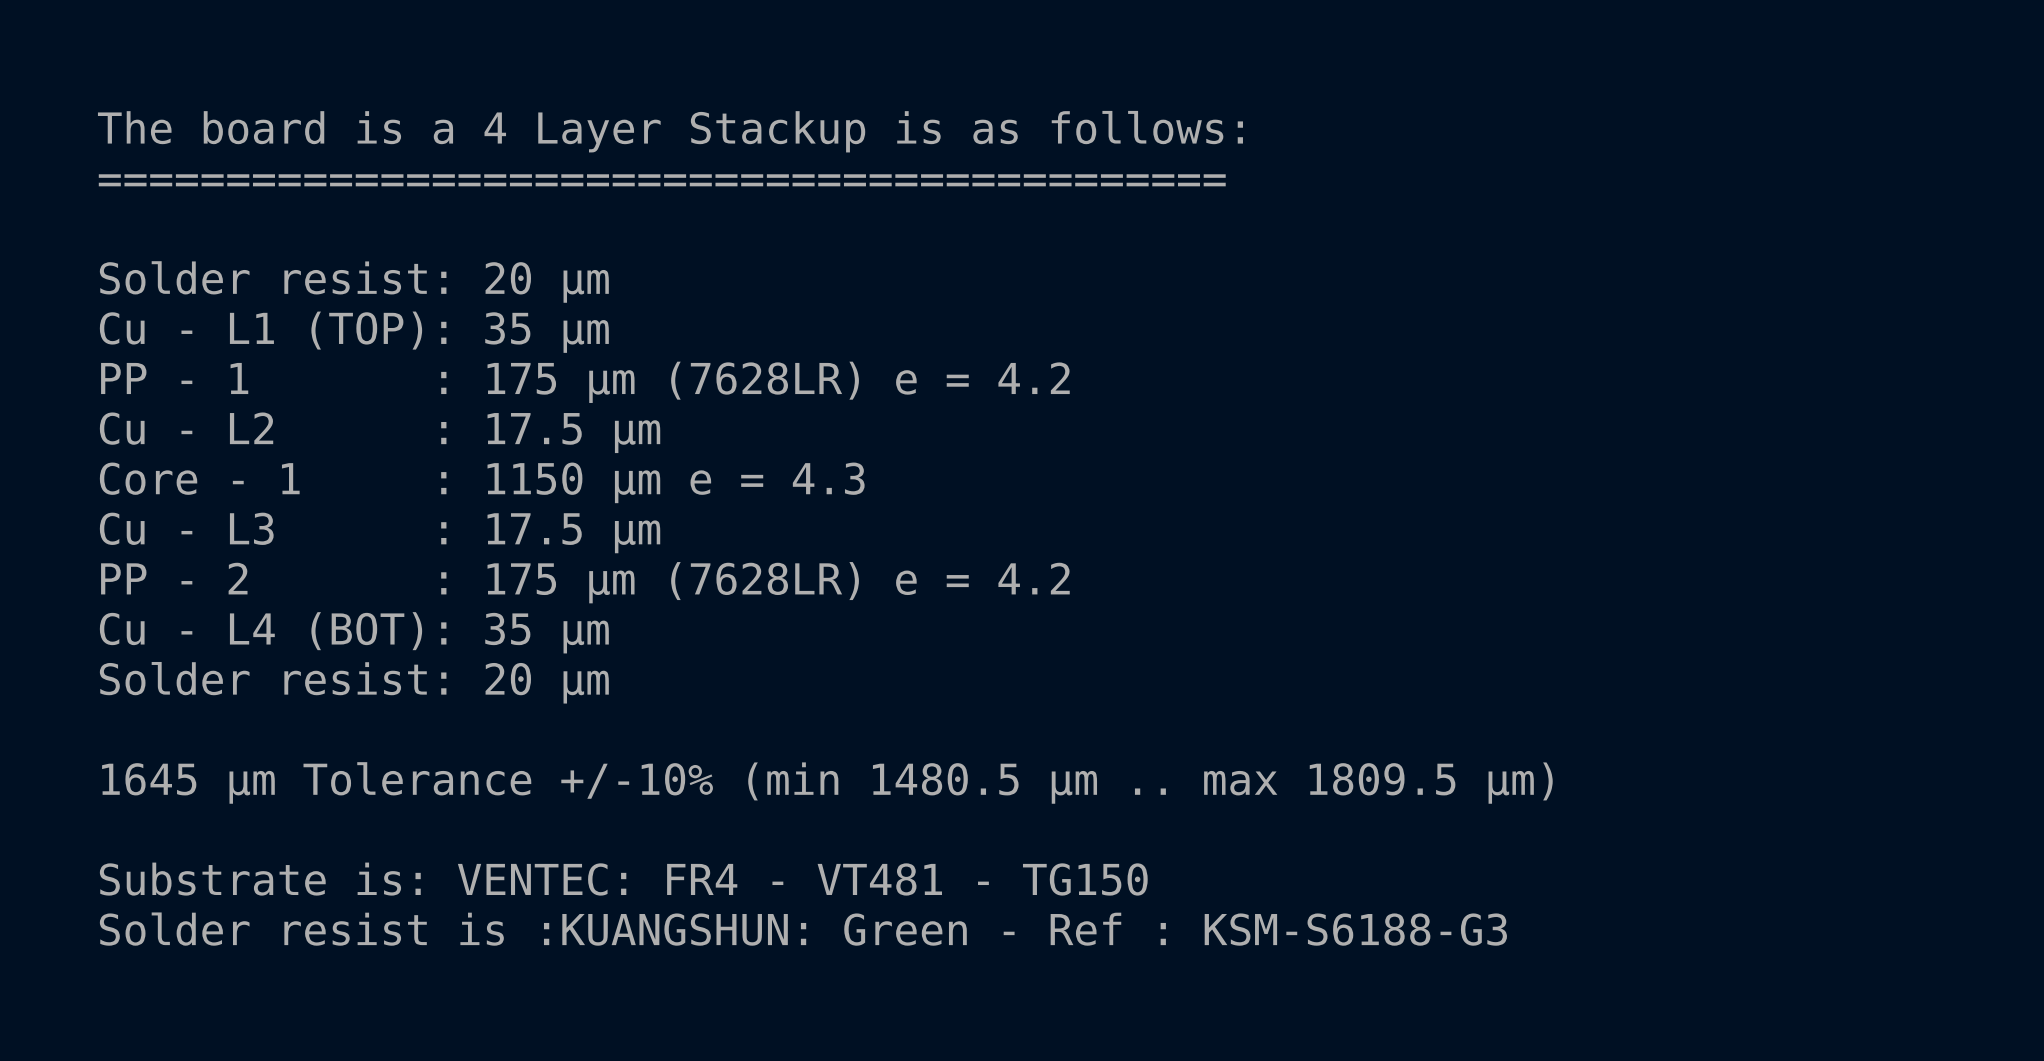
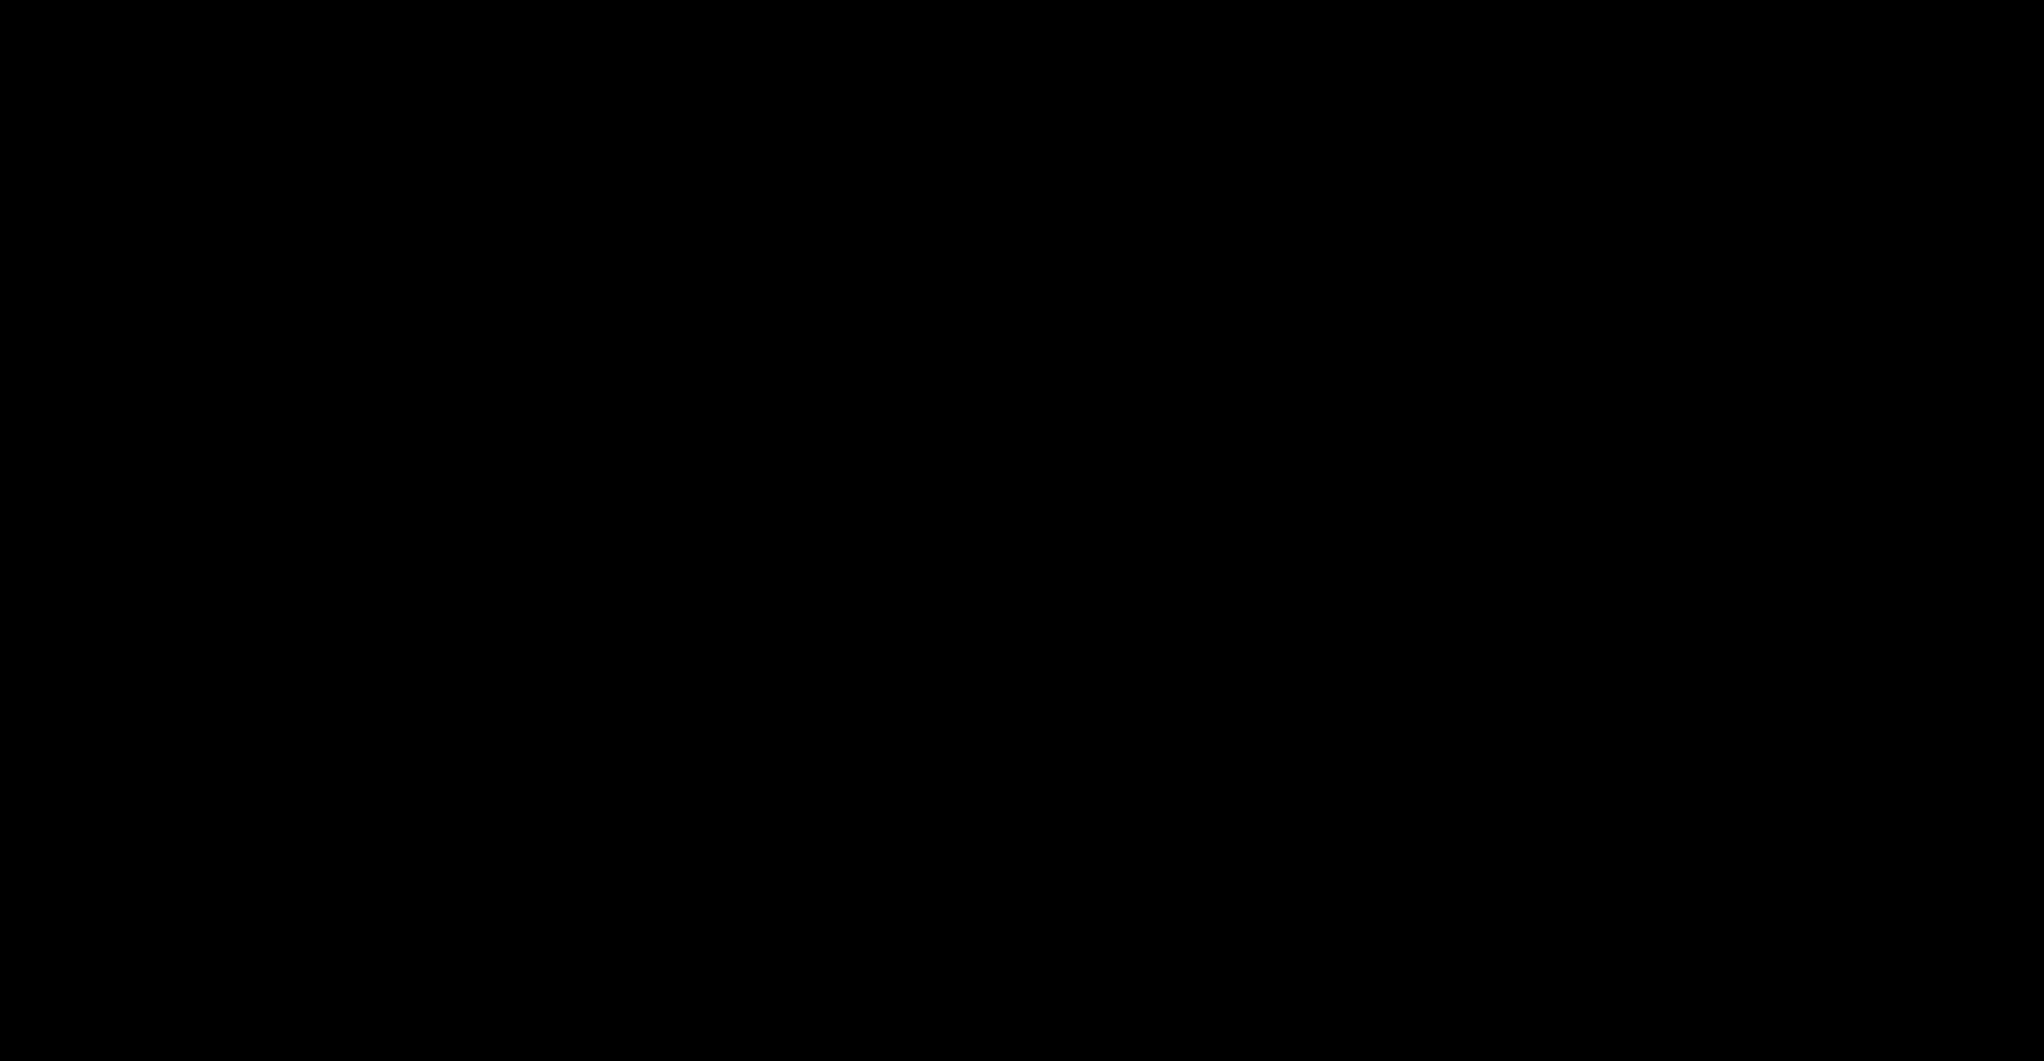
text: The board is a 4 Layer Stackup is as follows: (670, 131) -> none
text: ============================================ (662, 180) -> none
text: Solder resist: 20 µm (354, 281) -> none
text: Cu - L1 (TOP): 35 µm (354, 332) -> none
text: PP - 1 : 175 µm (7628LR) e = 4.2 (585, 382) -> none
text: Cu - L2 : 17.5 µm (380, 432) -> none
text: Core - 1 : 1150 µm e = 4.3 (482, 482) -> none
text: Cu - L3 : 17.5 µm (380, 532) -> none
text: PP - 2 : 175 µm (7628LR) e = 4.2 (585, 582) -> none
text: Cu - L4 (BOT): 35 µm (354, 632) -> none
text: Solder resist: 20 µm (354, 682) -> none
text: 1645 µm Tolerance +/-10% (min 1480.5 µm .. max 1809.5 µm) (827, 782) -> none
text: Substrate is: VENTEC: FR4 - VT481 - TG150 (623, 879) -> none
text: Solder resist is :KUANGSHUN: Green - Ref : KSM-S6188-G3 (803, 929) -> none

